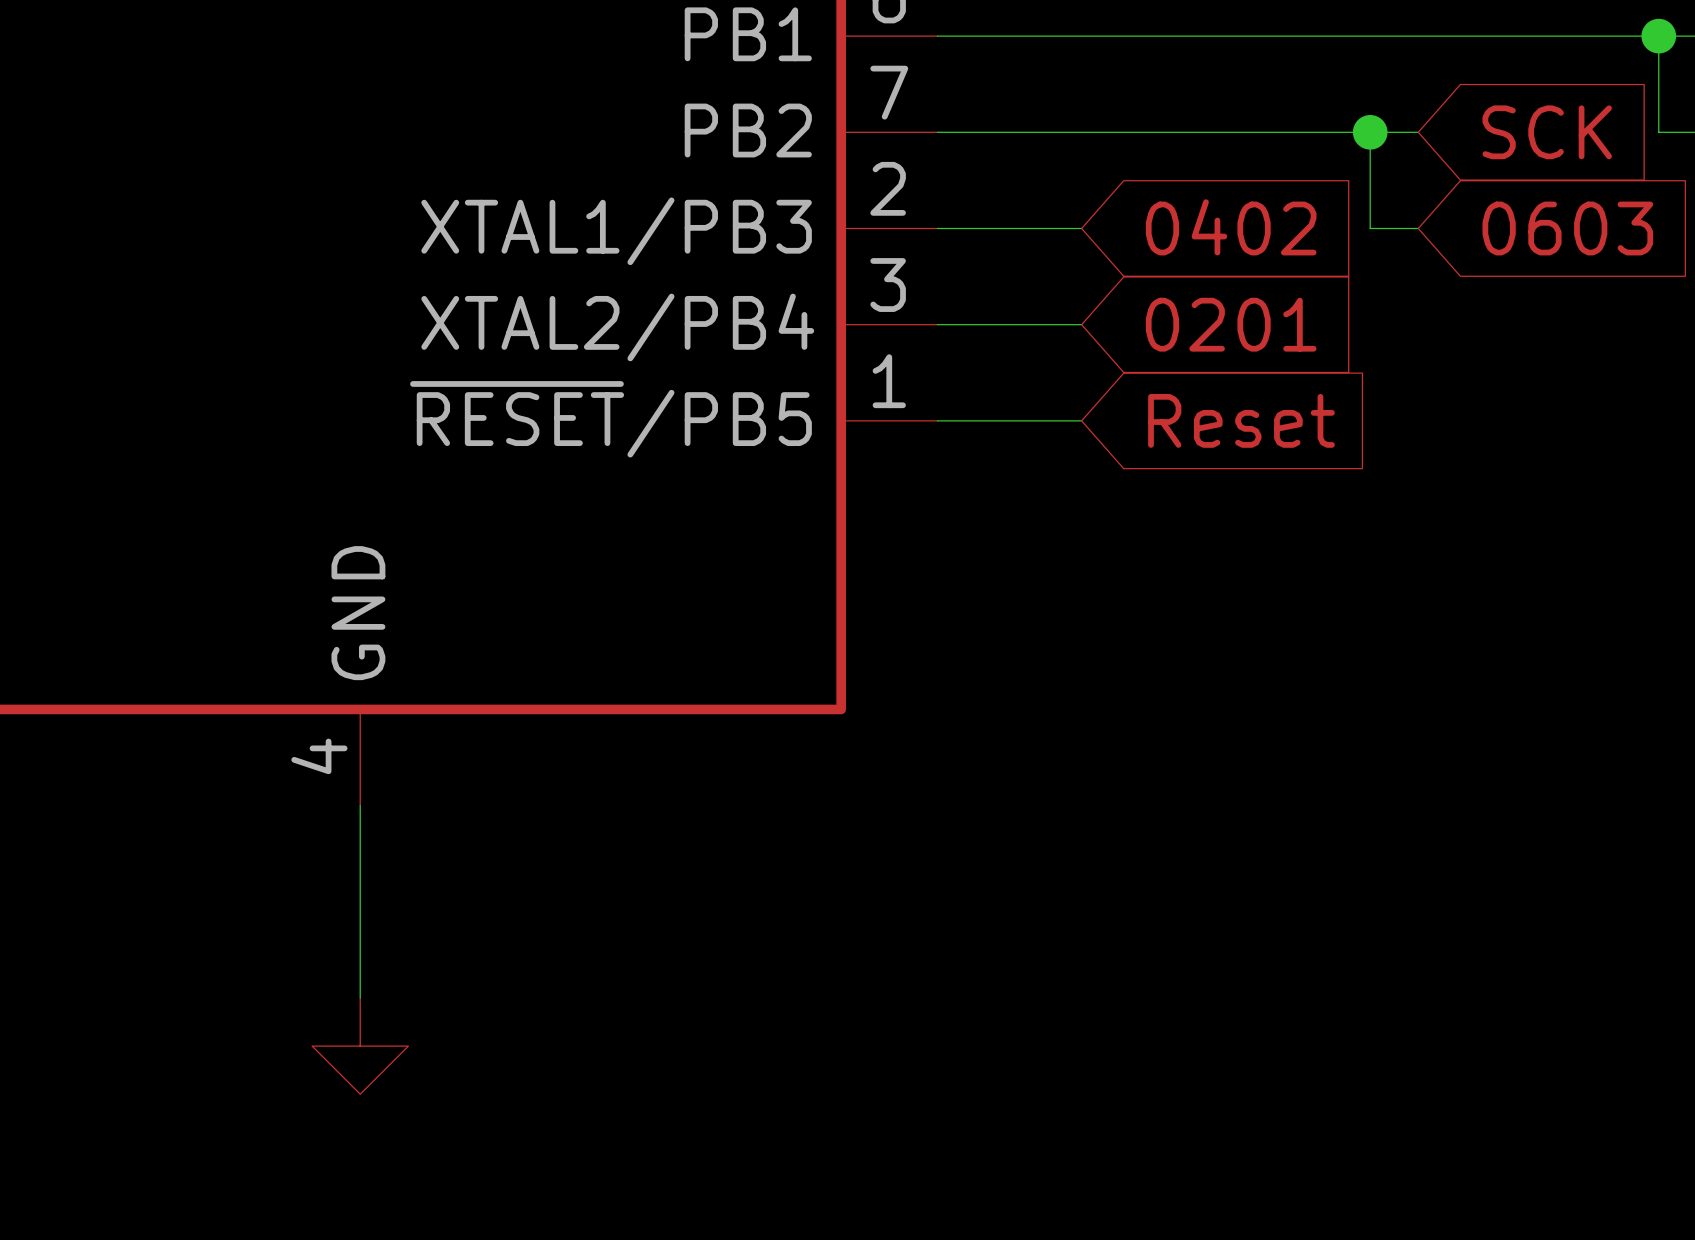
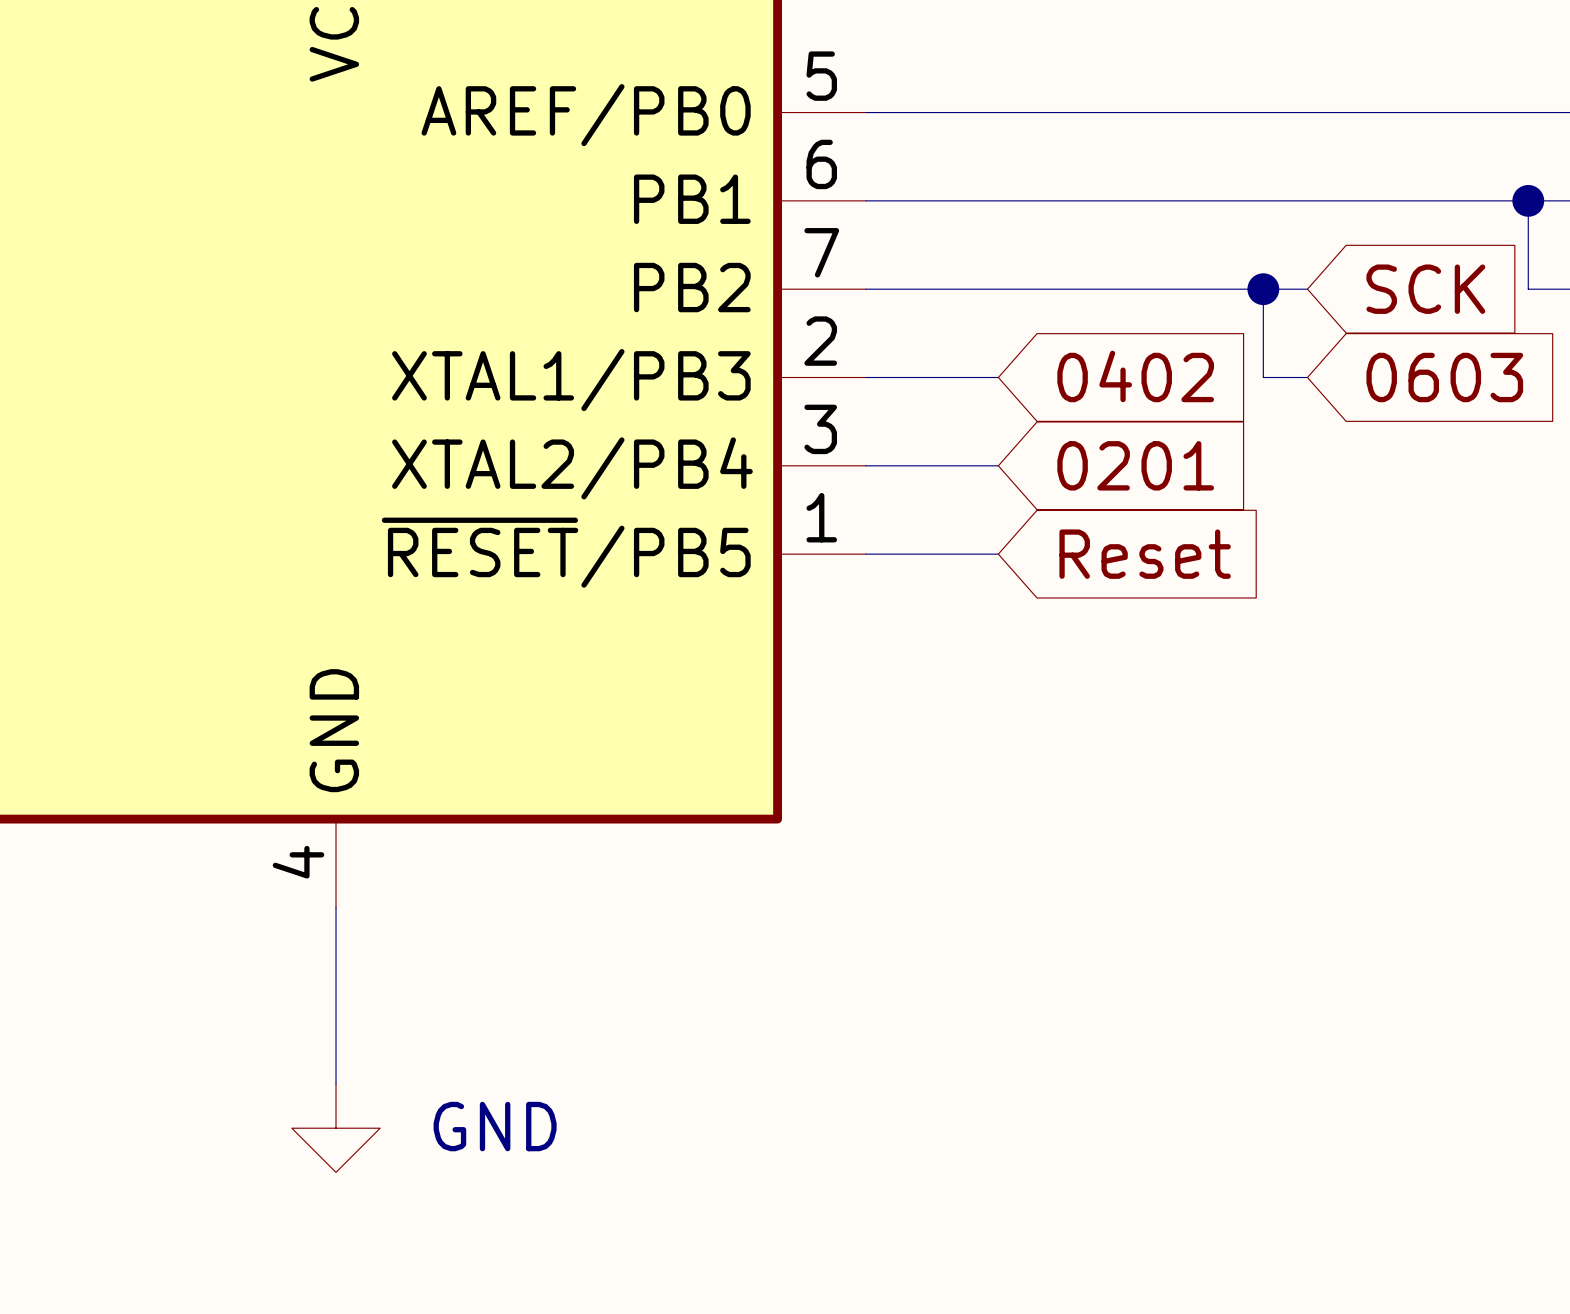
power symbol text: none -> GND (495, 1126)

